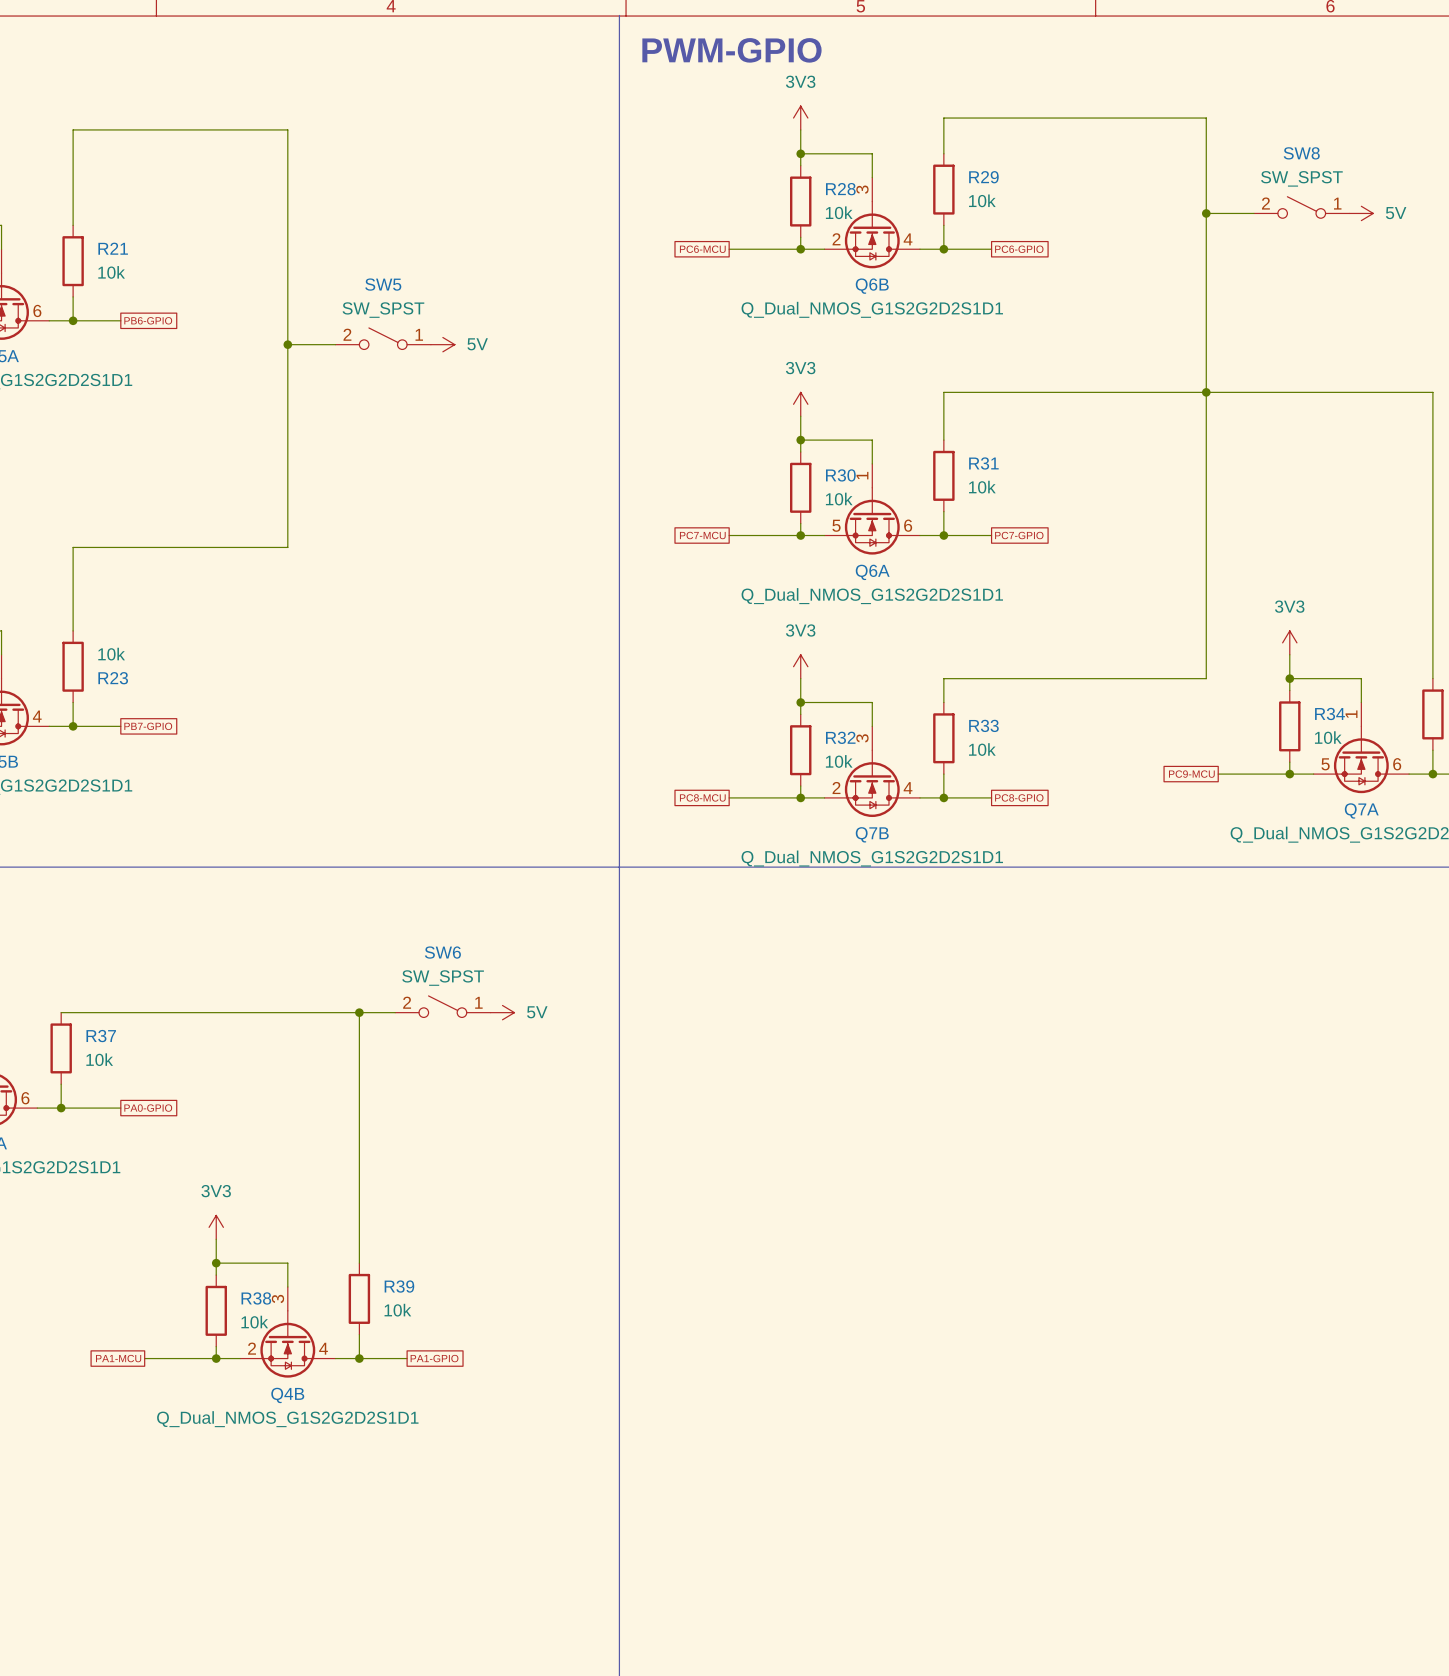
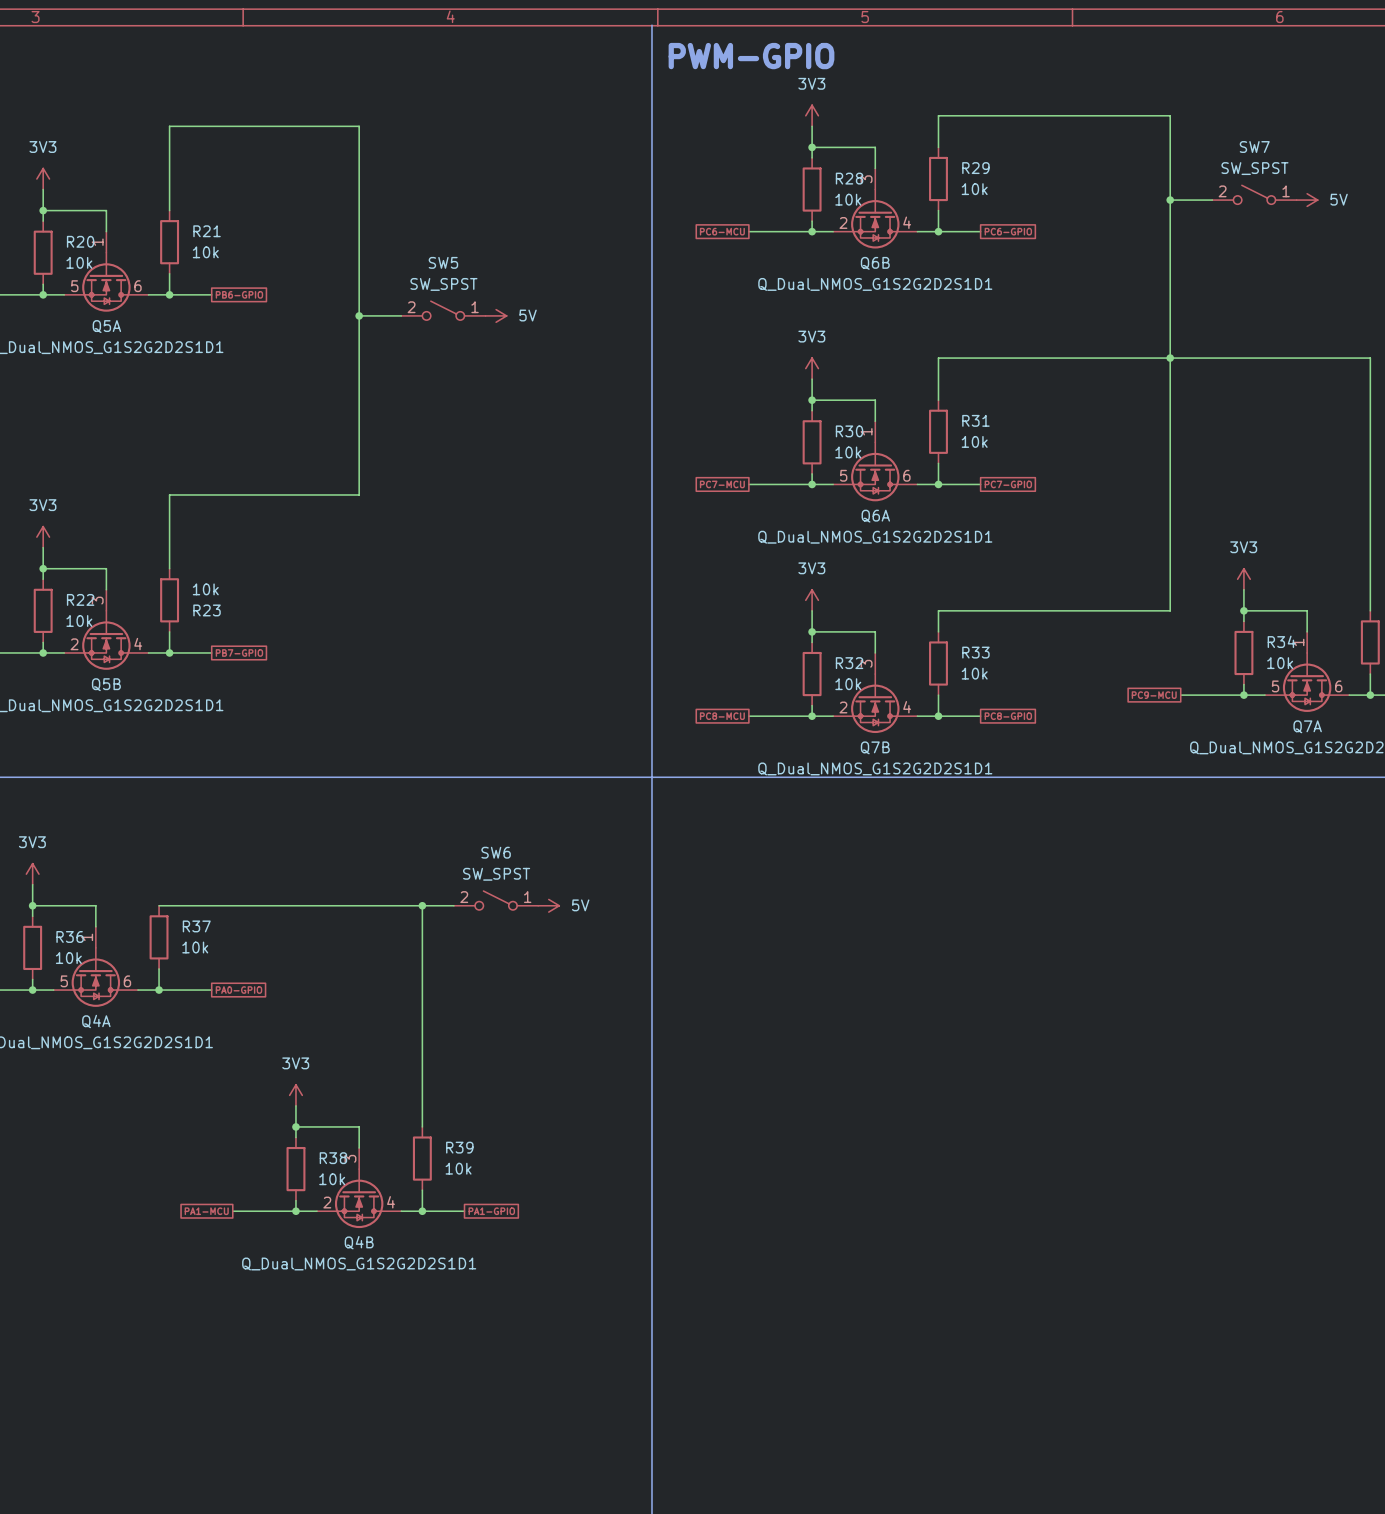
SW8 name: SW8 (1301, 153) -> SW7 (1254, 147)

